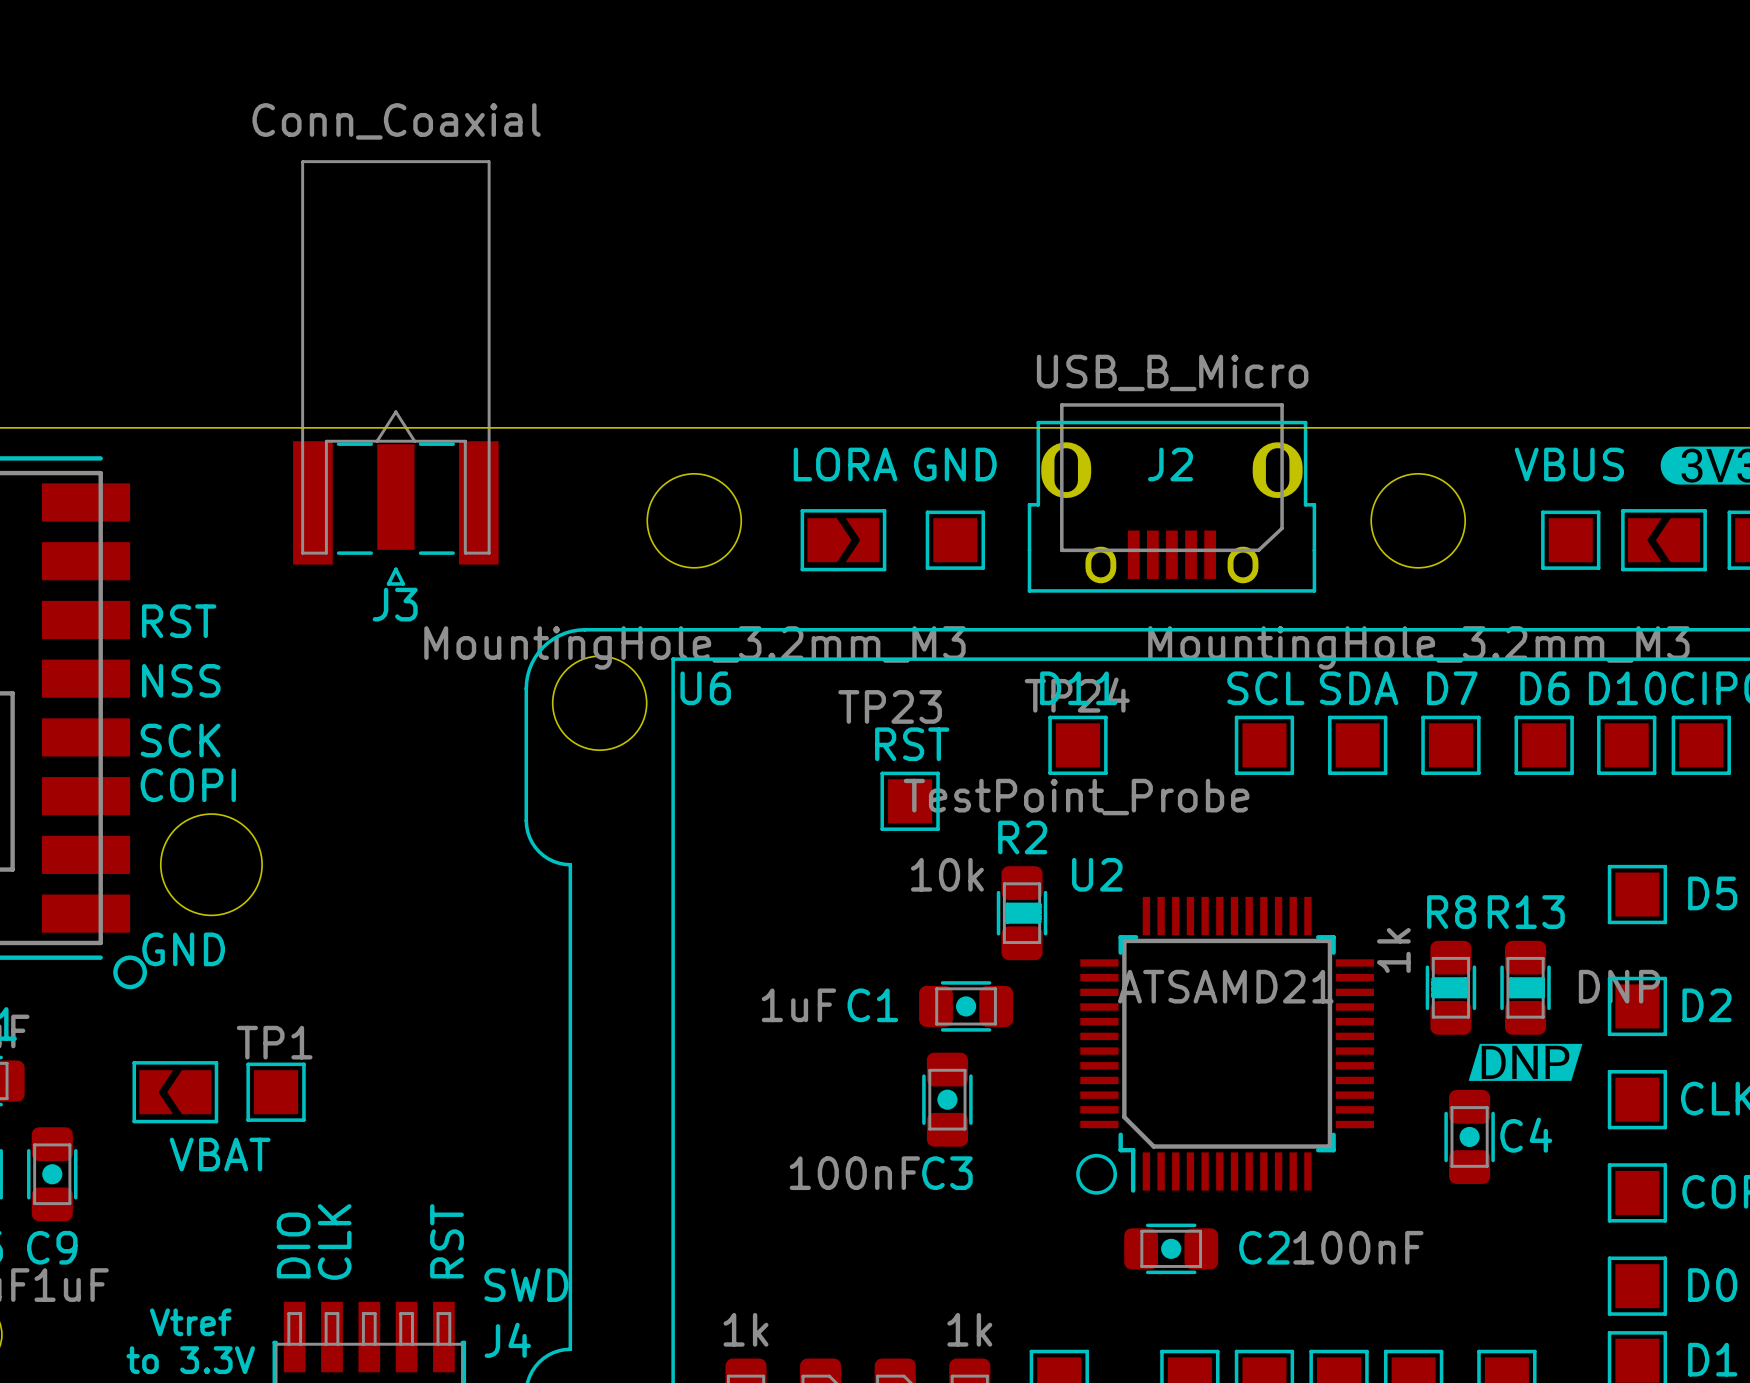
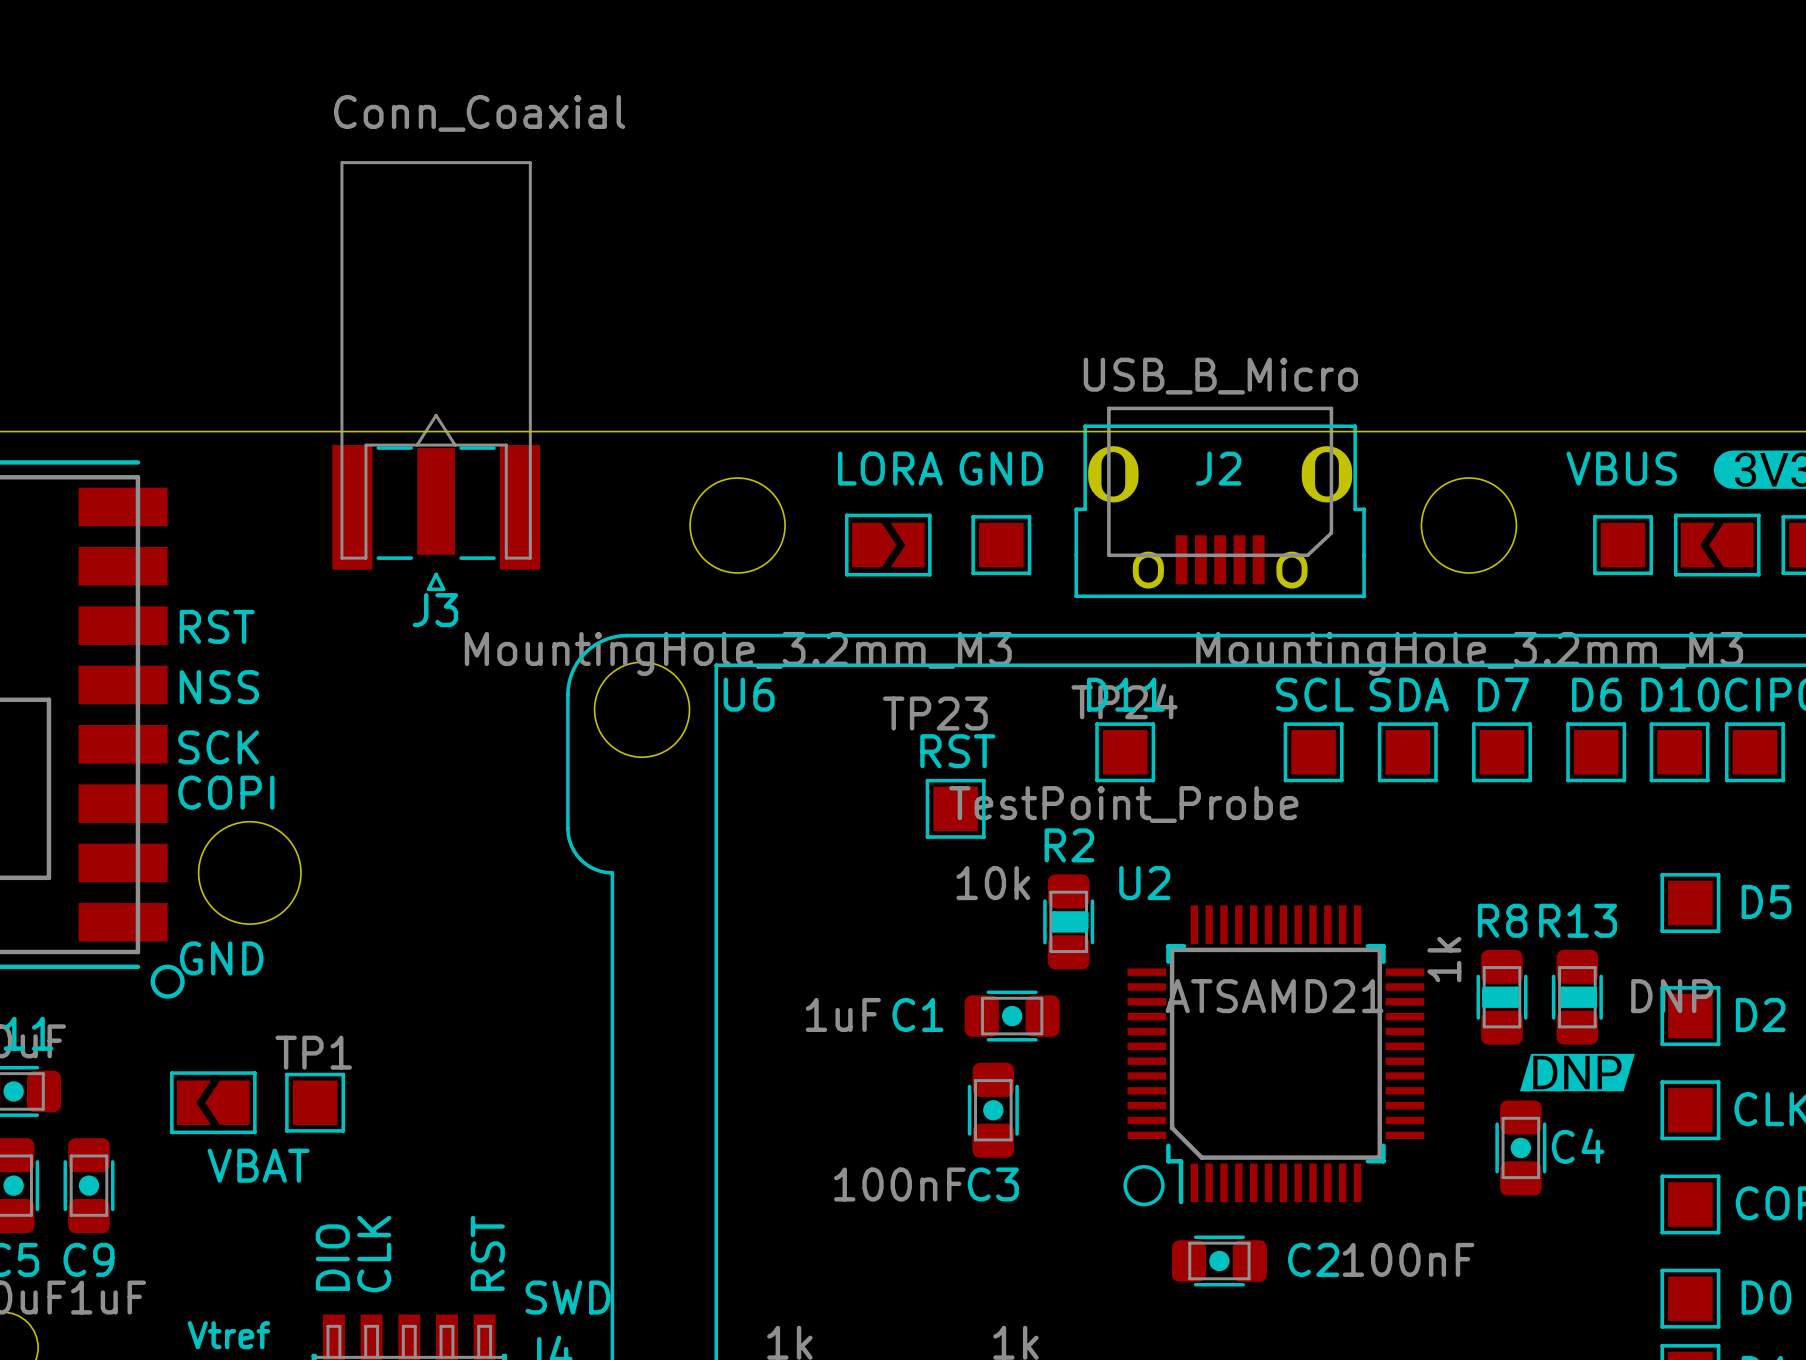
J3 value position: Conn_Coaxial (396, 121) -> Conn_Coaxial (479, 113)

